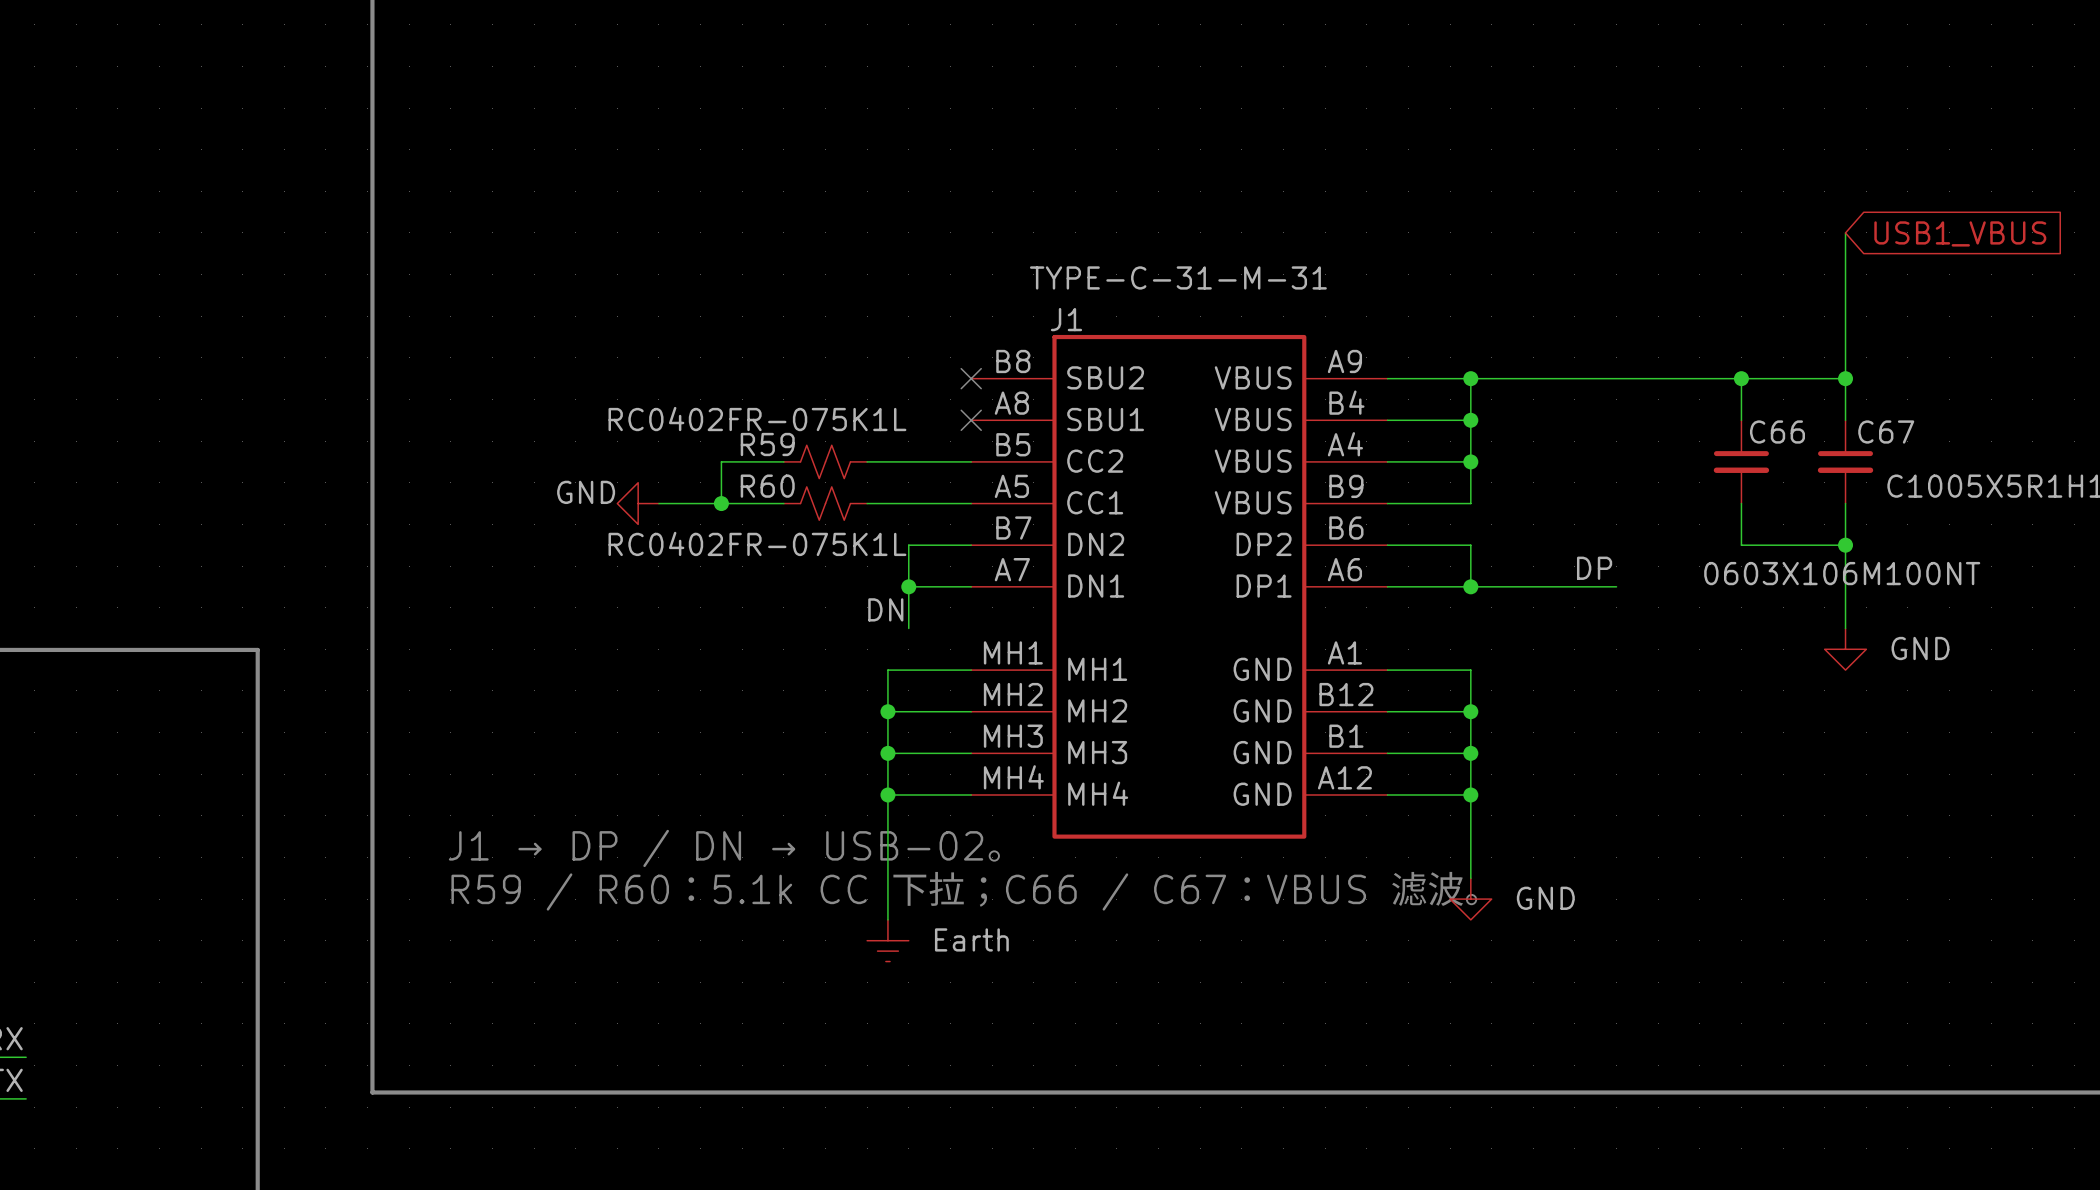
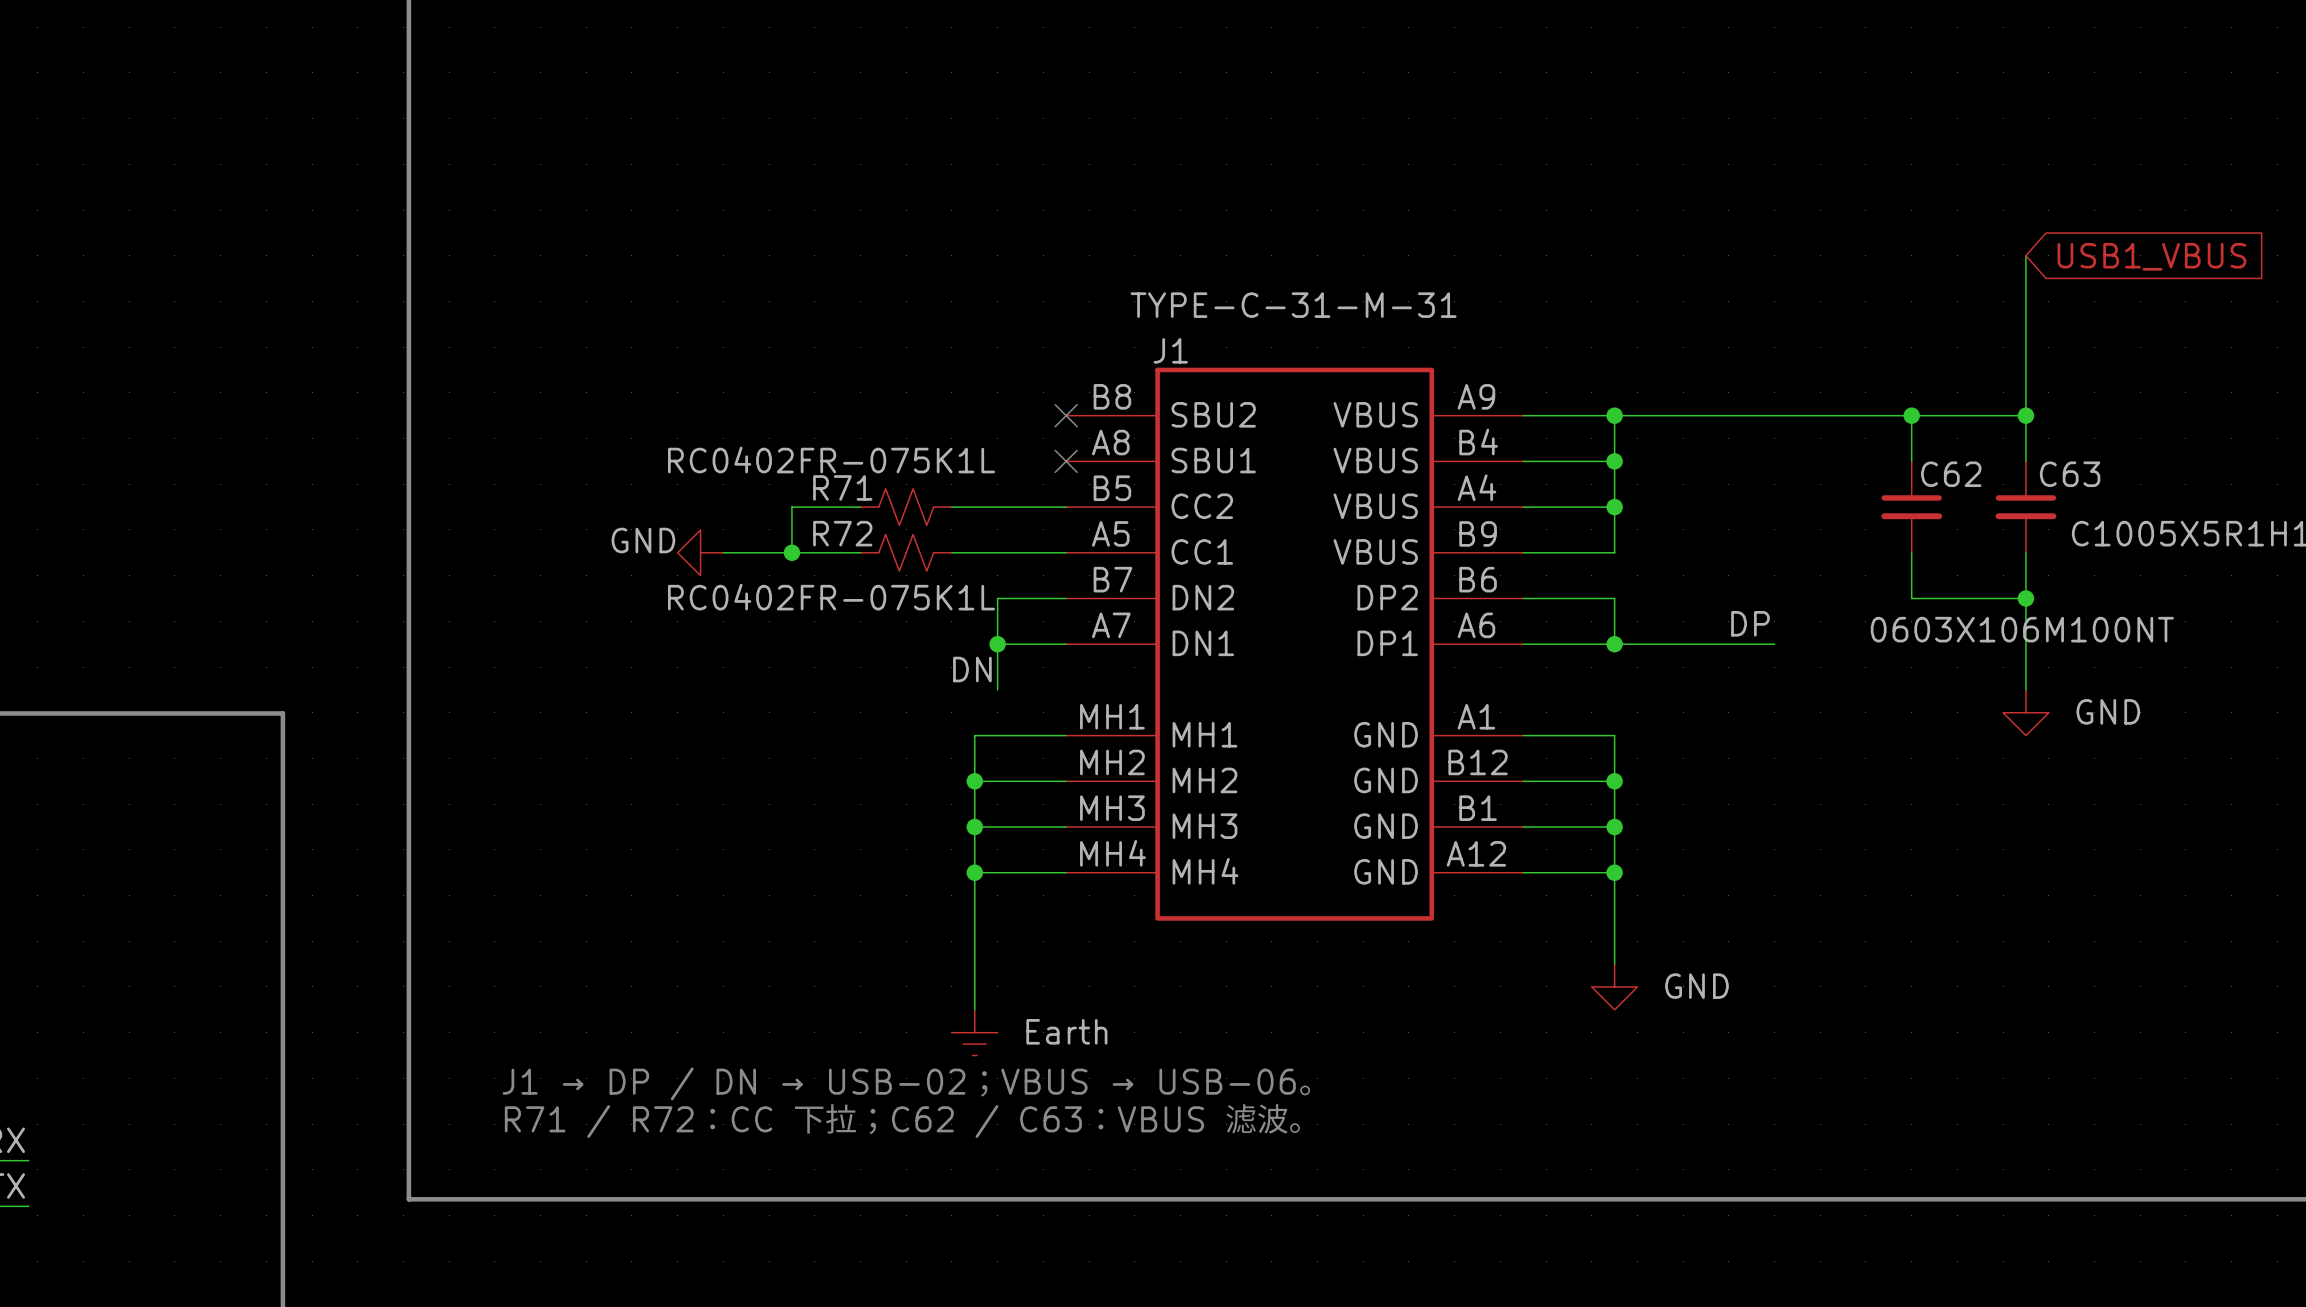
C66 name: C66 (1777, 432) -> C62 (1951, 474)
C67 name: C67 (1886, 432) -> C63 (2070, 474)
R59 name: R59 (767, 444) -> R71 (842, 487)
R60 name: R60 (767, 486) -> R72 (842, 533)
text: J1 → DP / DN → USB-02。 (725, 848) -> none
text: R59 / R60：5.1k CC 下拉；C66 / C67：VBUS 滤波。 (964, 890) -> none
text: none -> J1 → DP / DN → USB-02；VBUS → USB-06。 (906, 1083)
text: none -> R71 / R72：CC 下拉；C62 / C63：VBUS 滤波。 (903, 1120)

